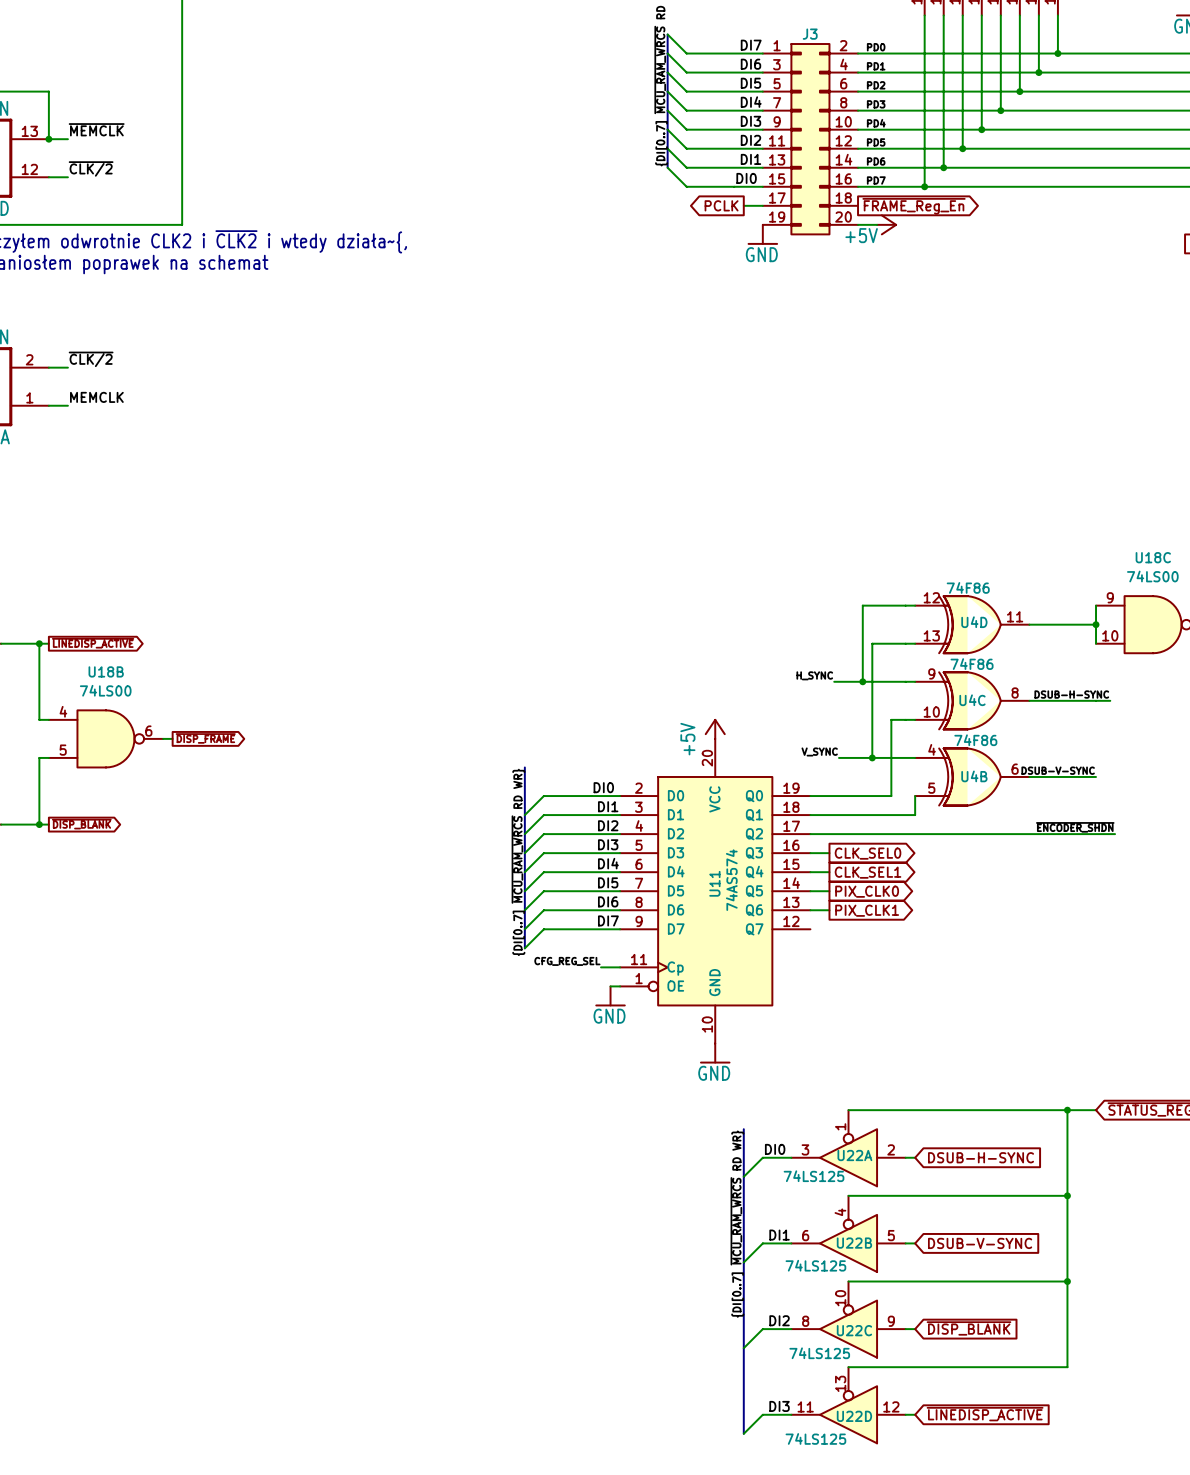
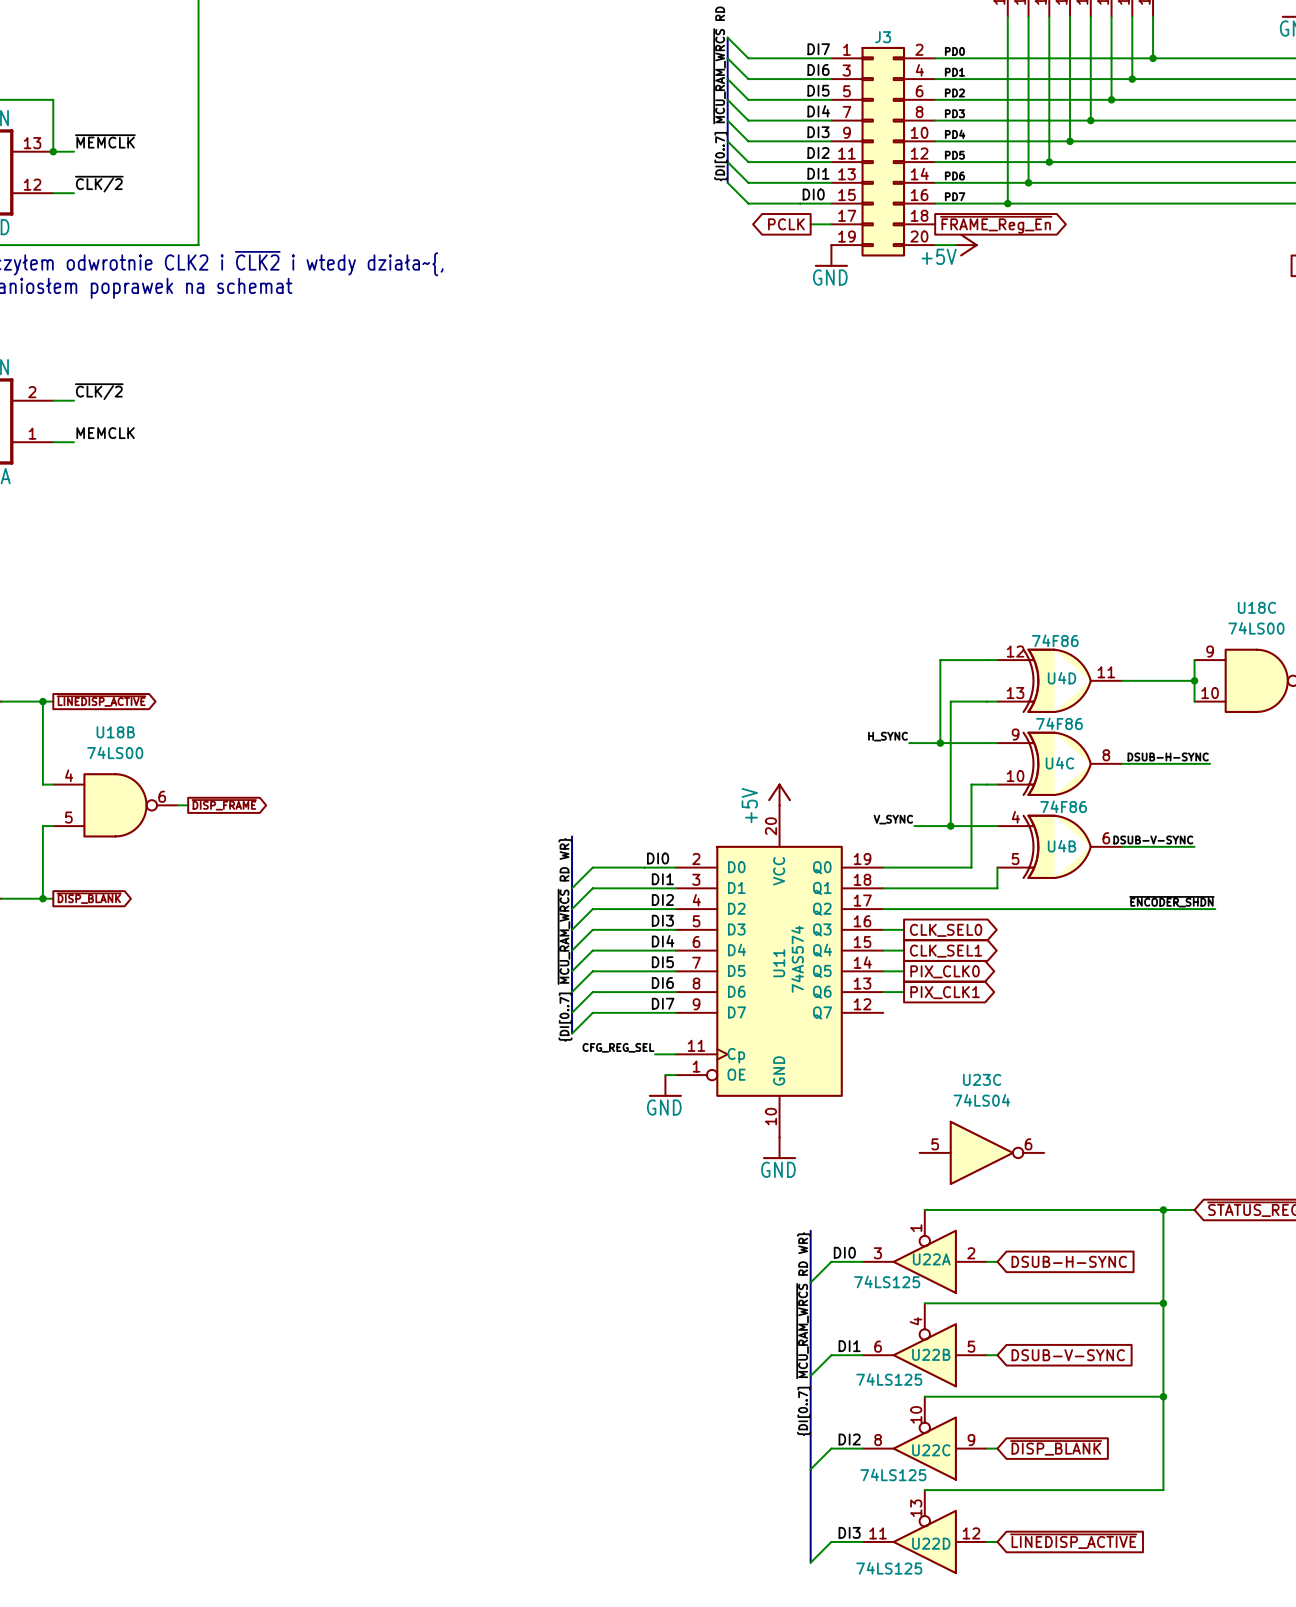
U23C: none -> 74LS04 (981, 1152)

